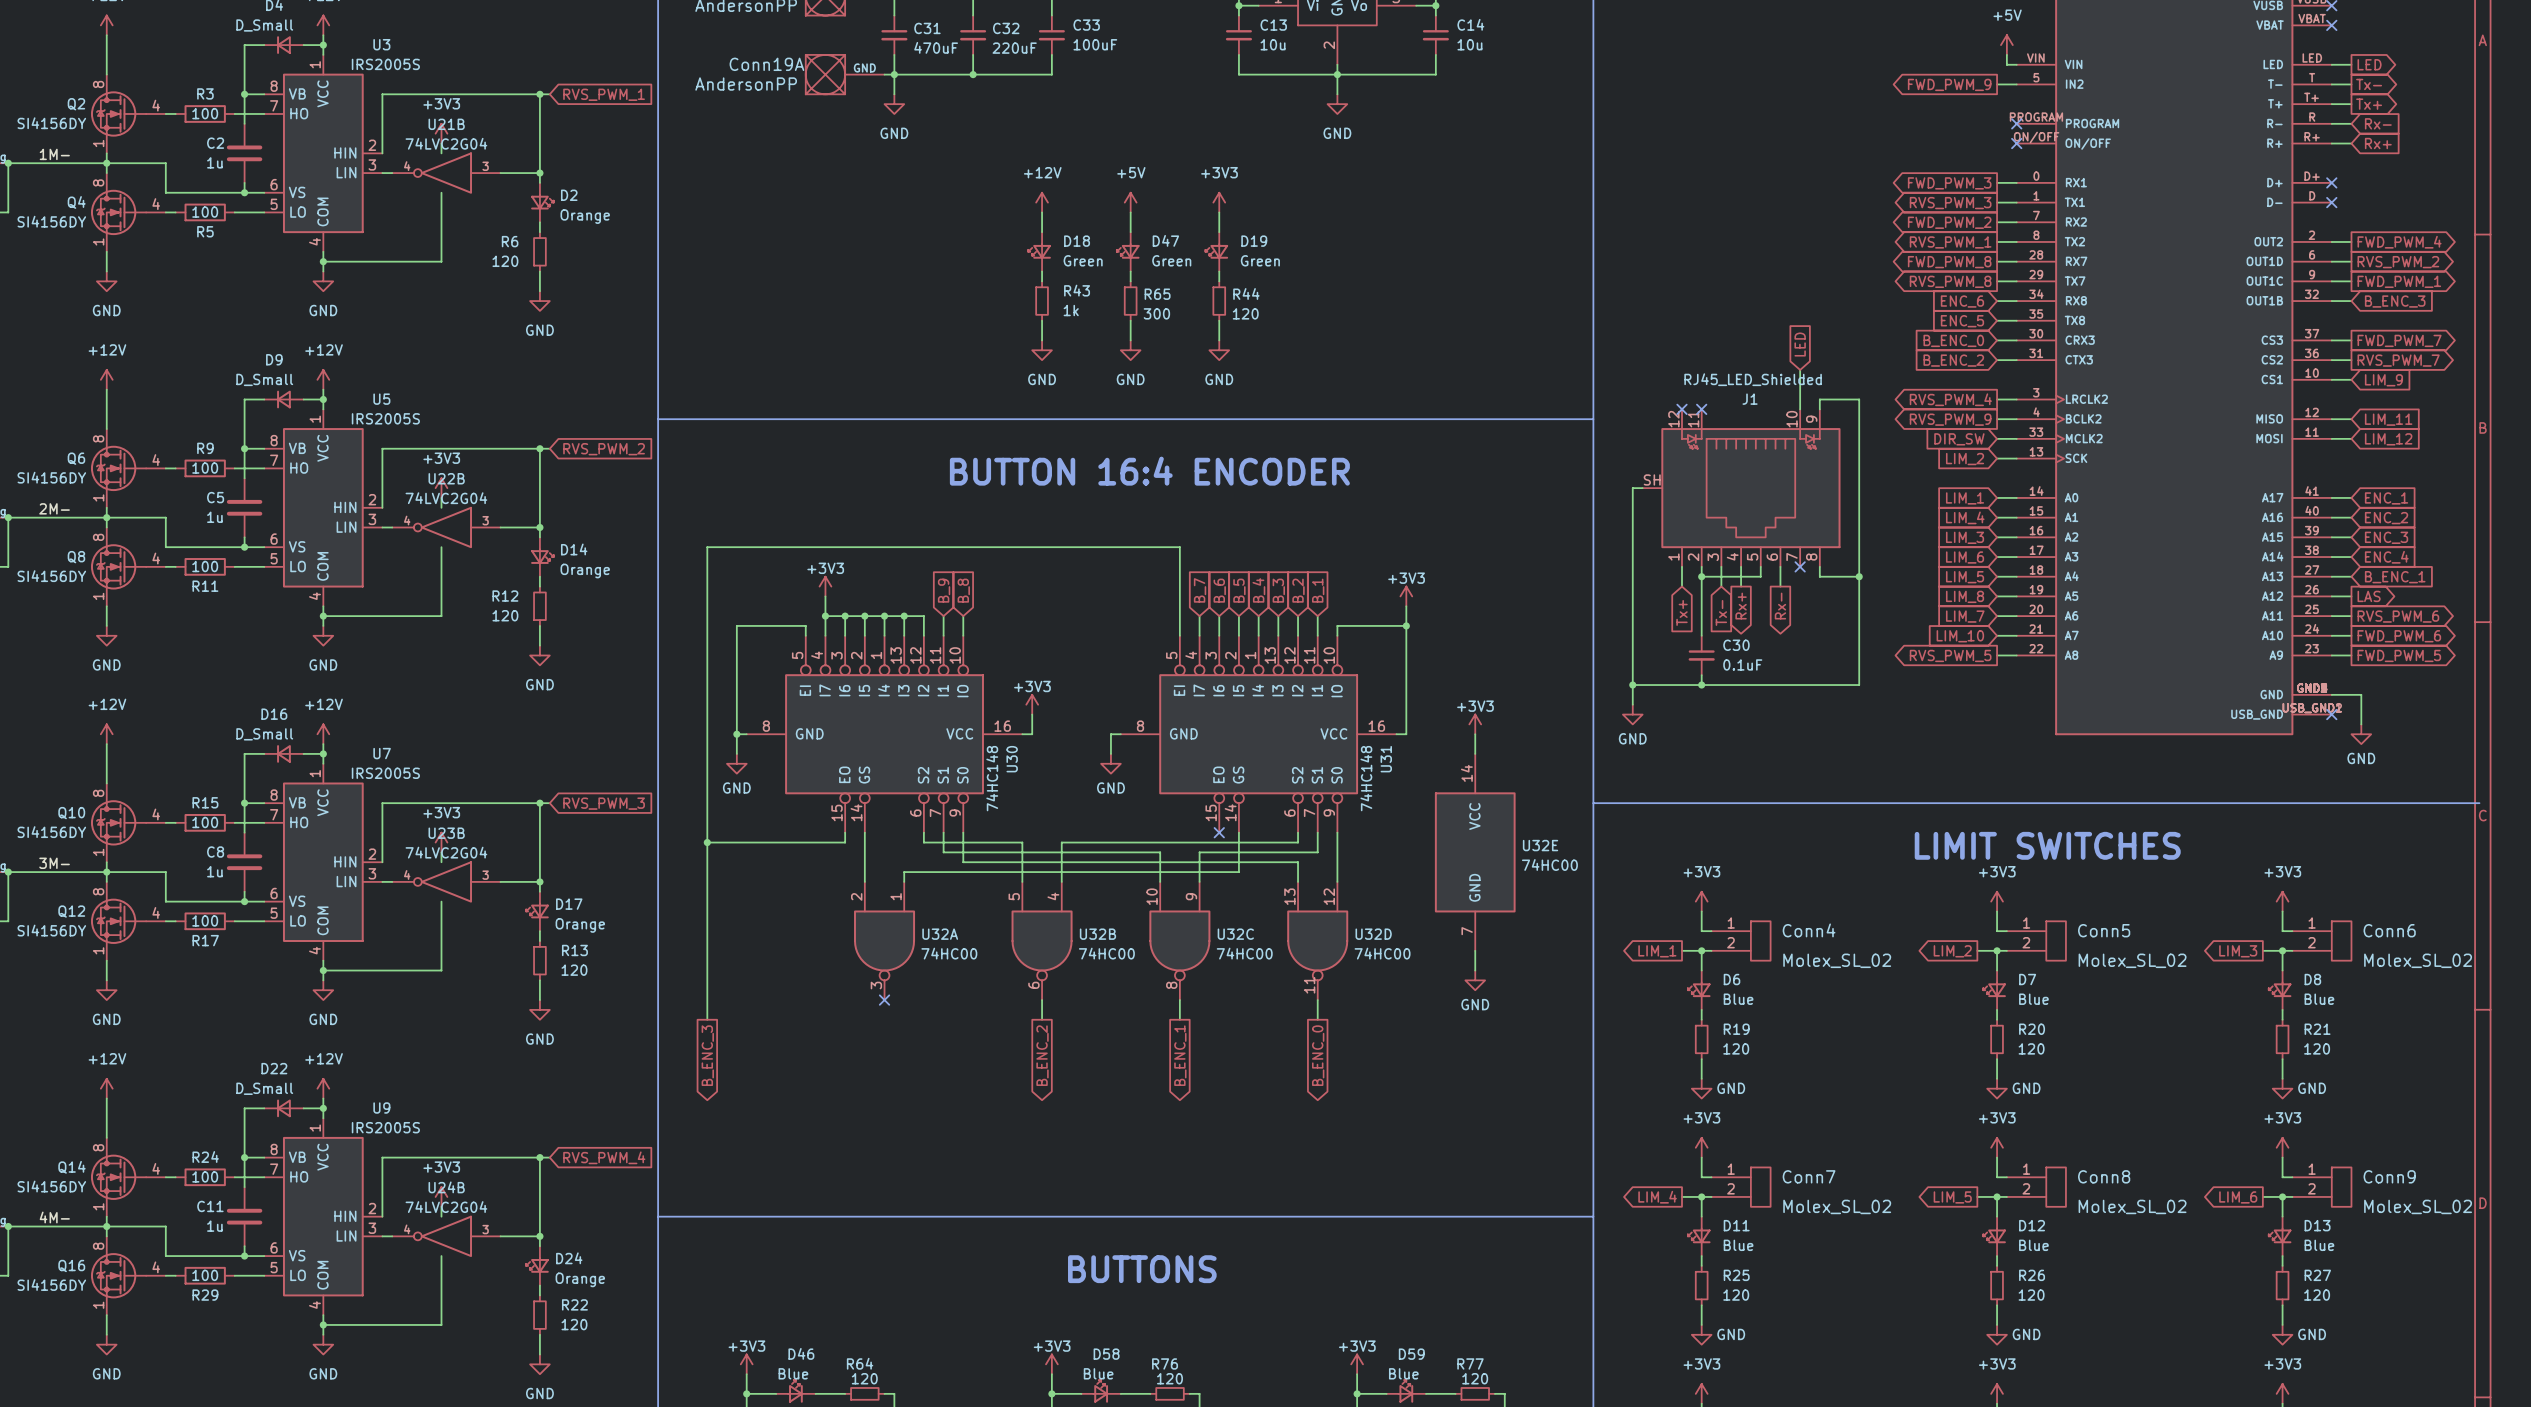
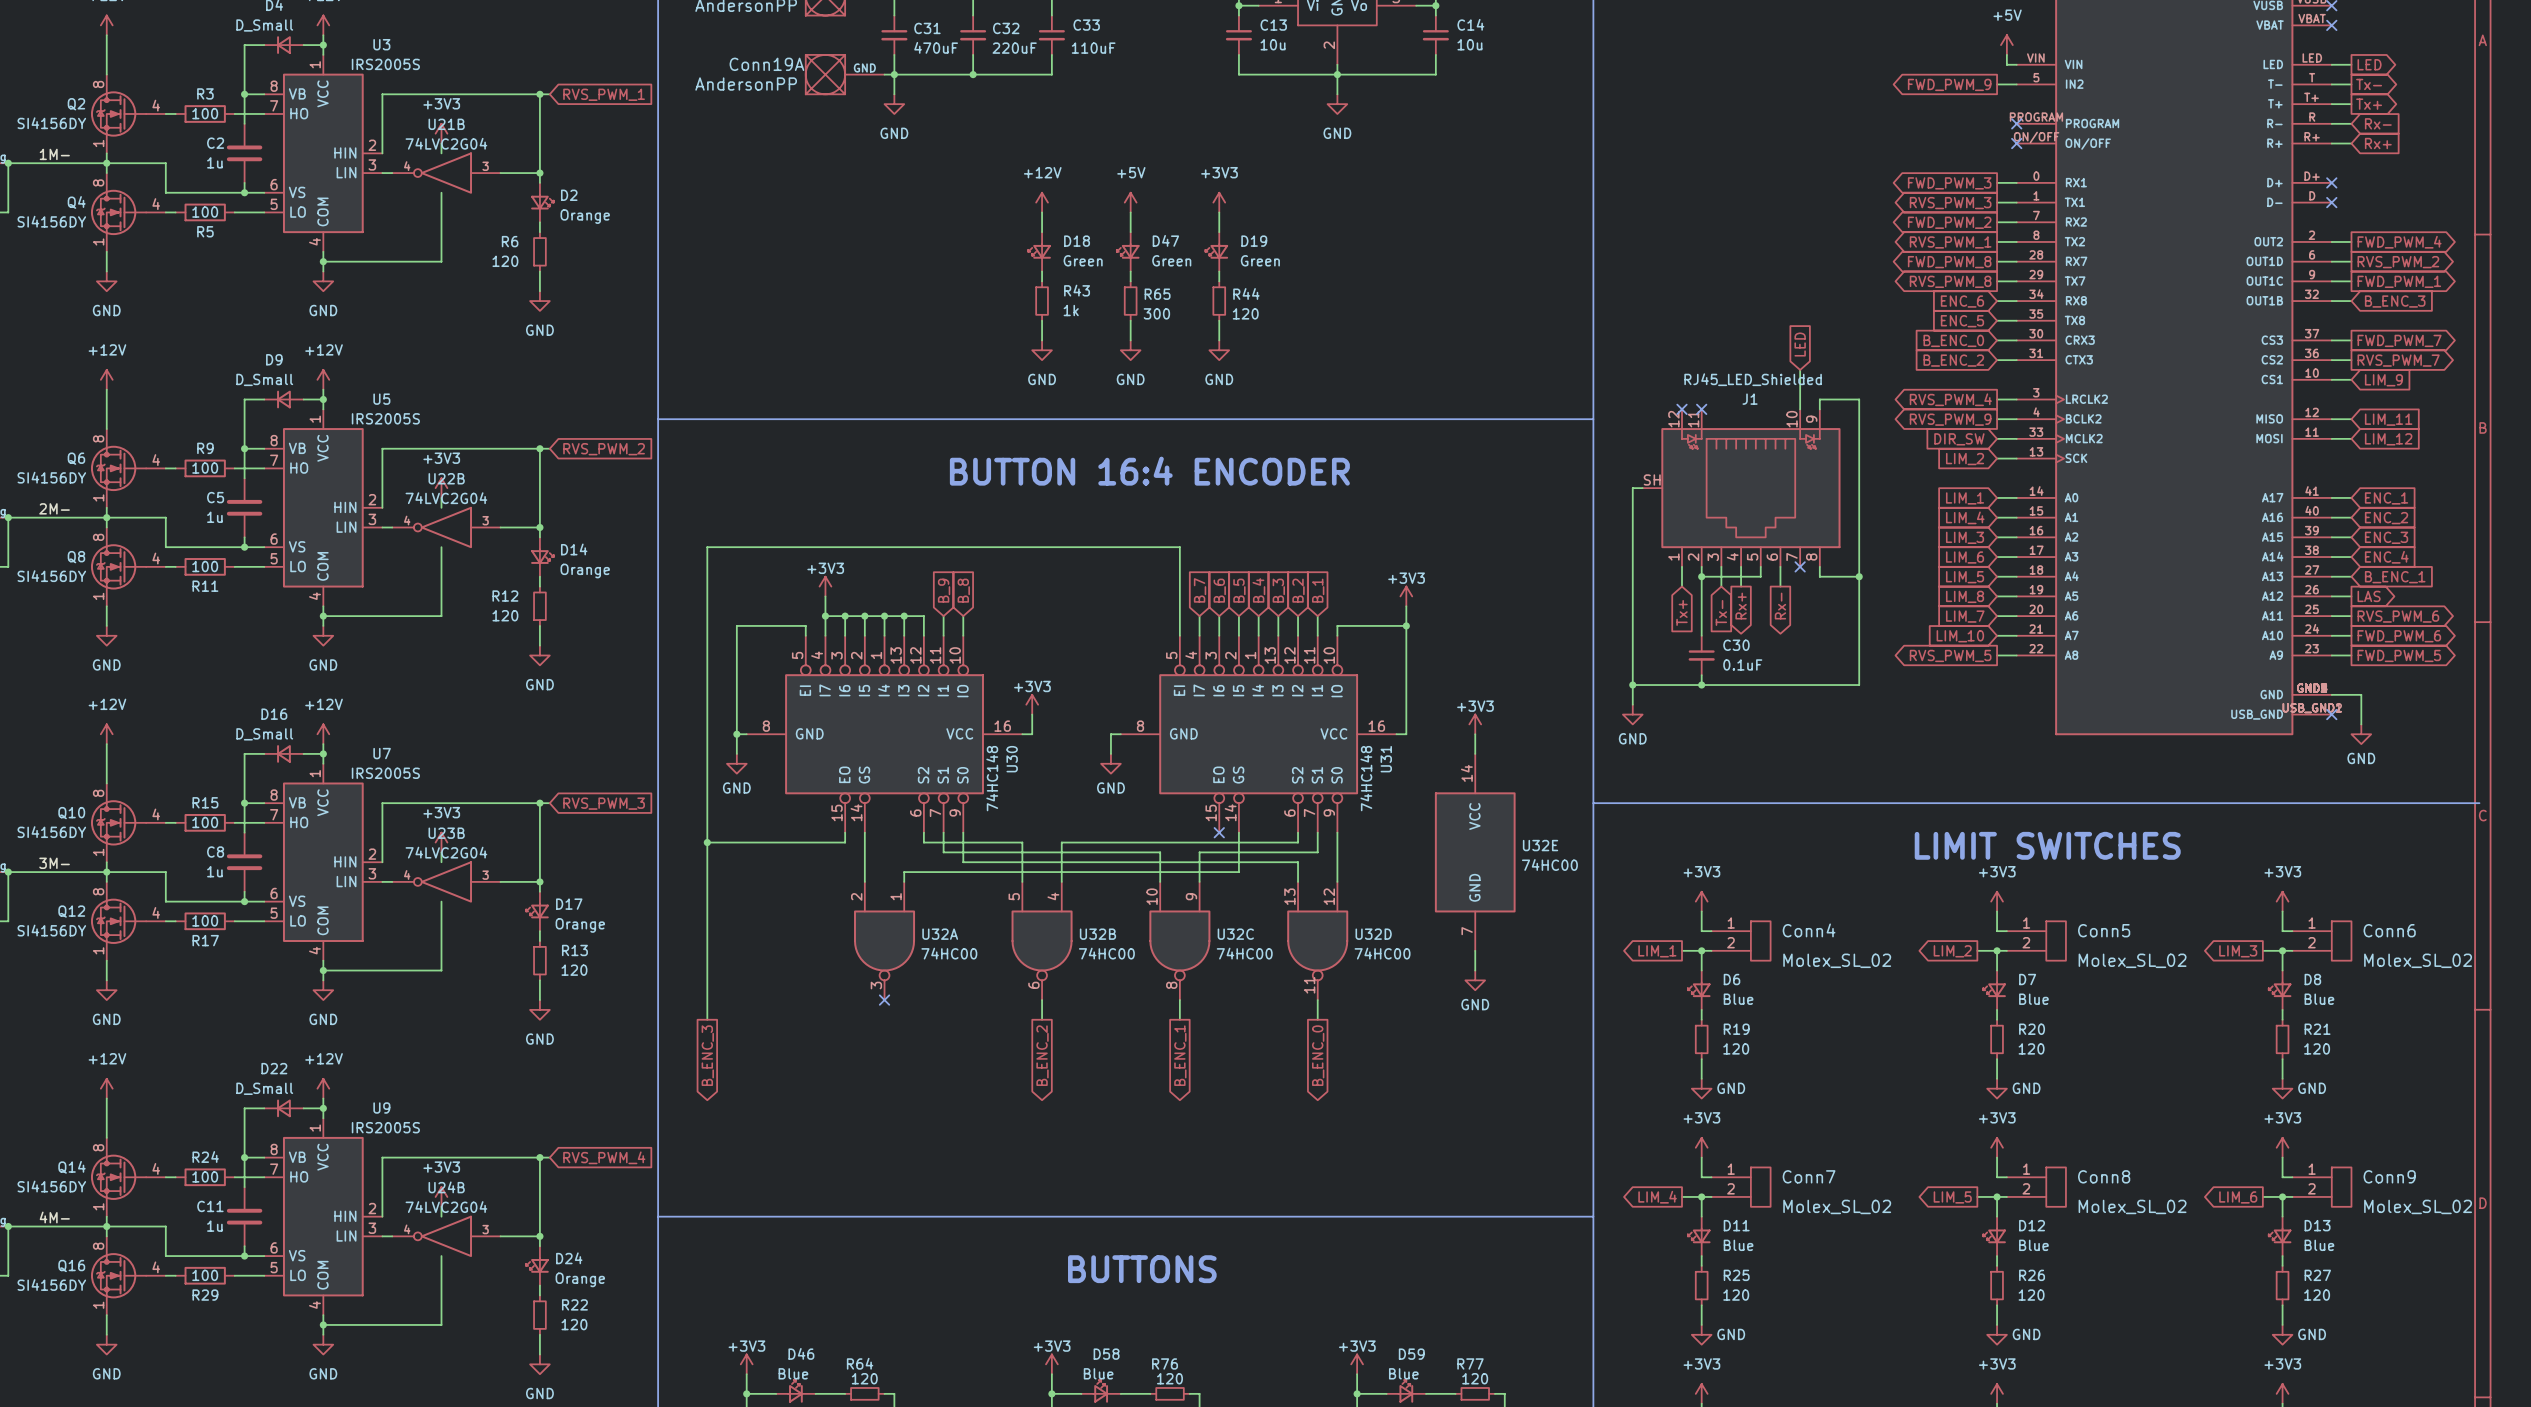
C33 value: 100uF (1095, 44) -> 110uF (1093, 48)

